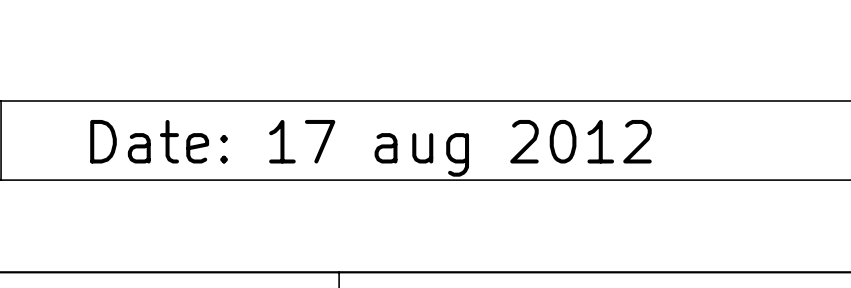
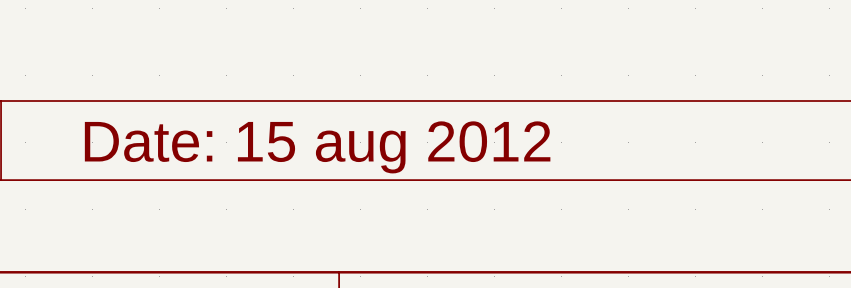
title block: Date: 17 aug 2012 (370, 148) -> Date: 15 aug 2012 (317, 147)

